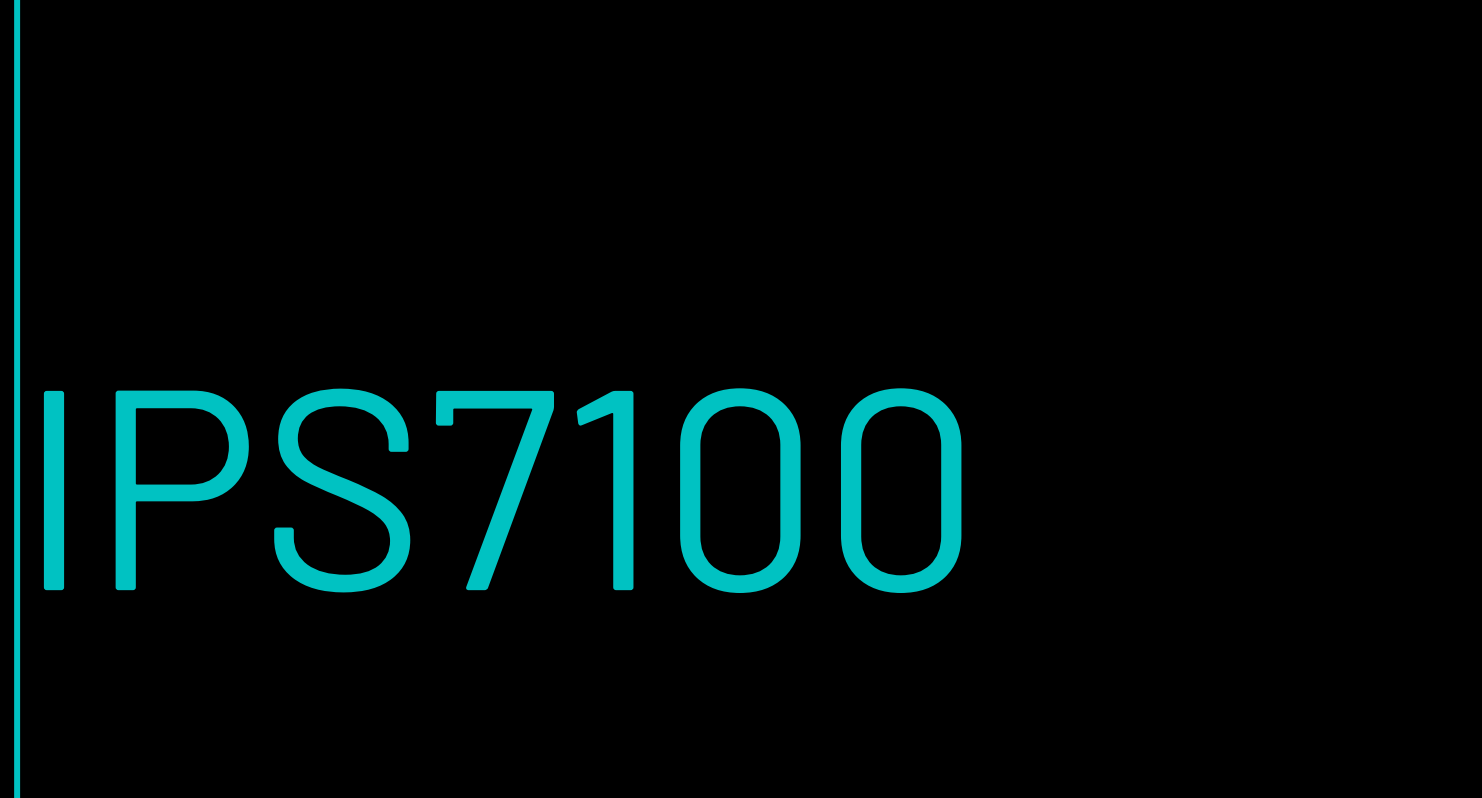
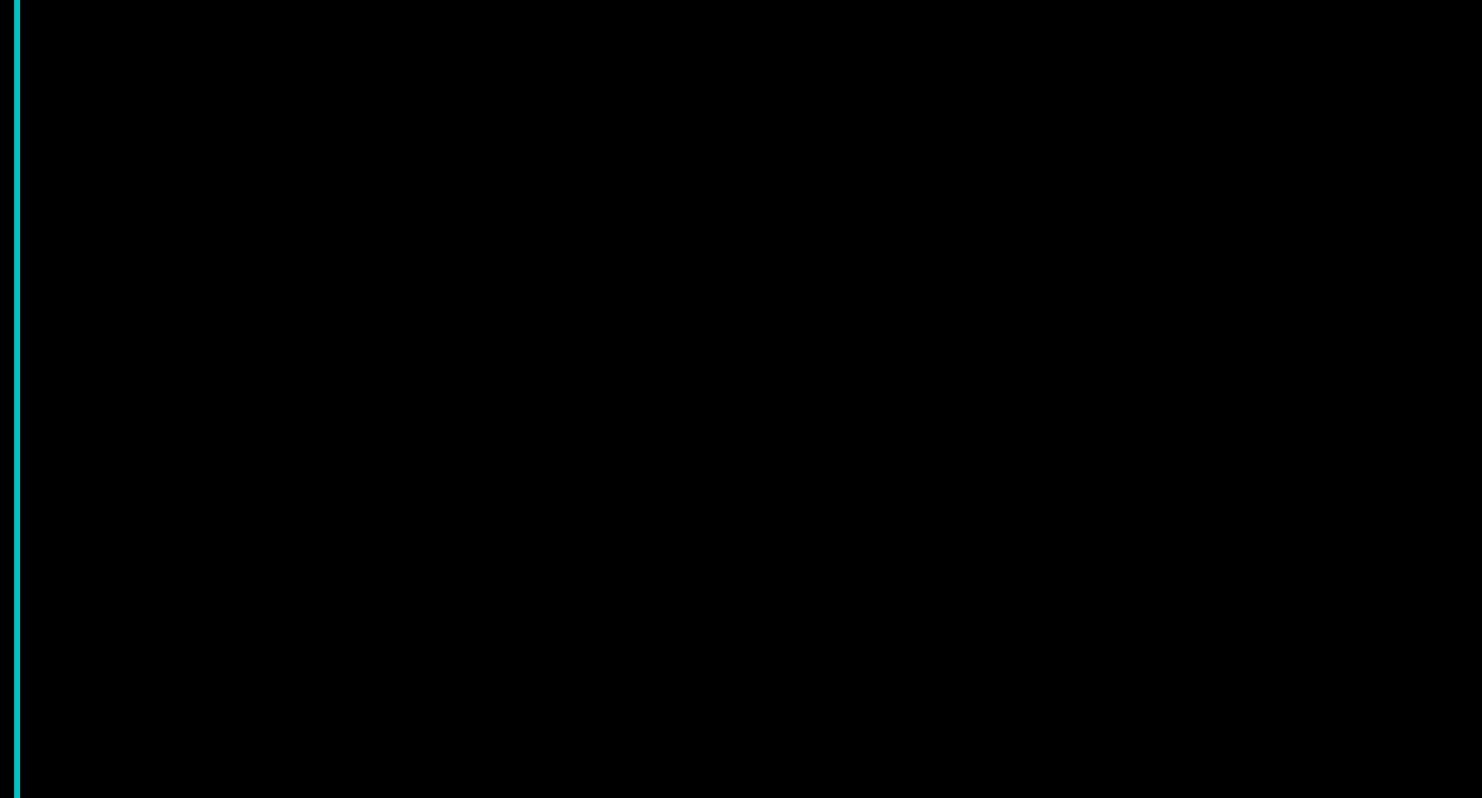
text: IPS7100 (502, 490) -> none

